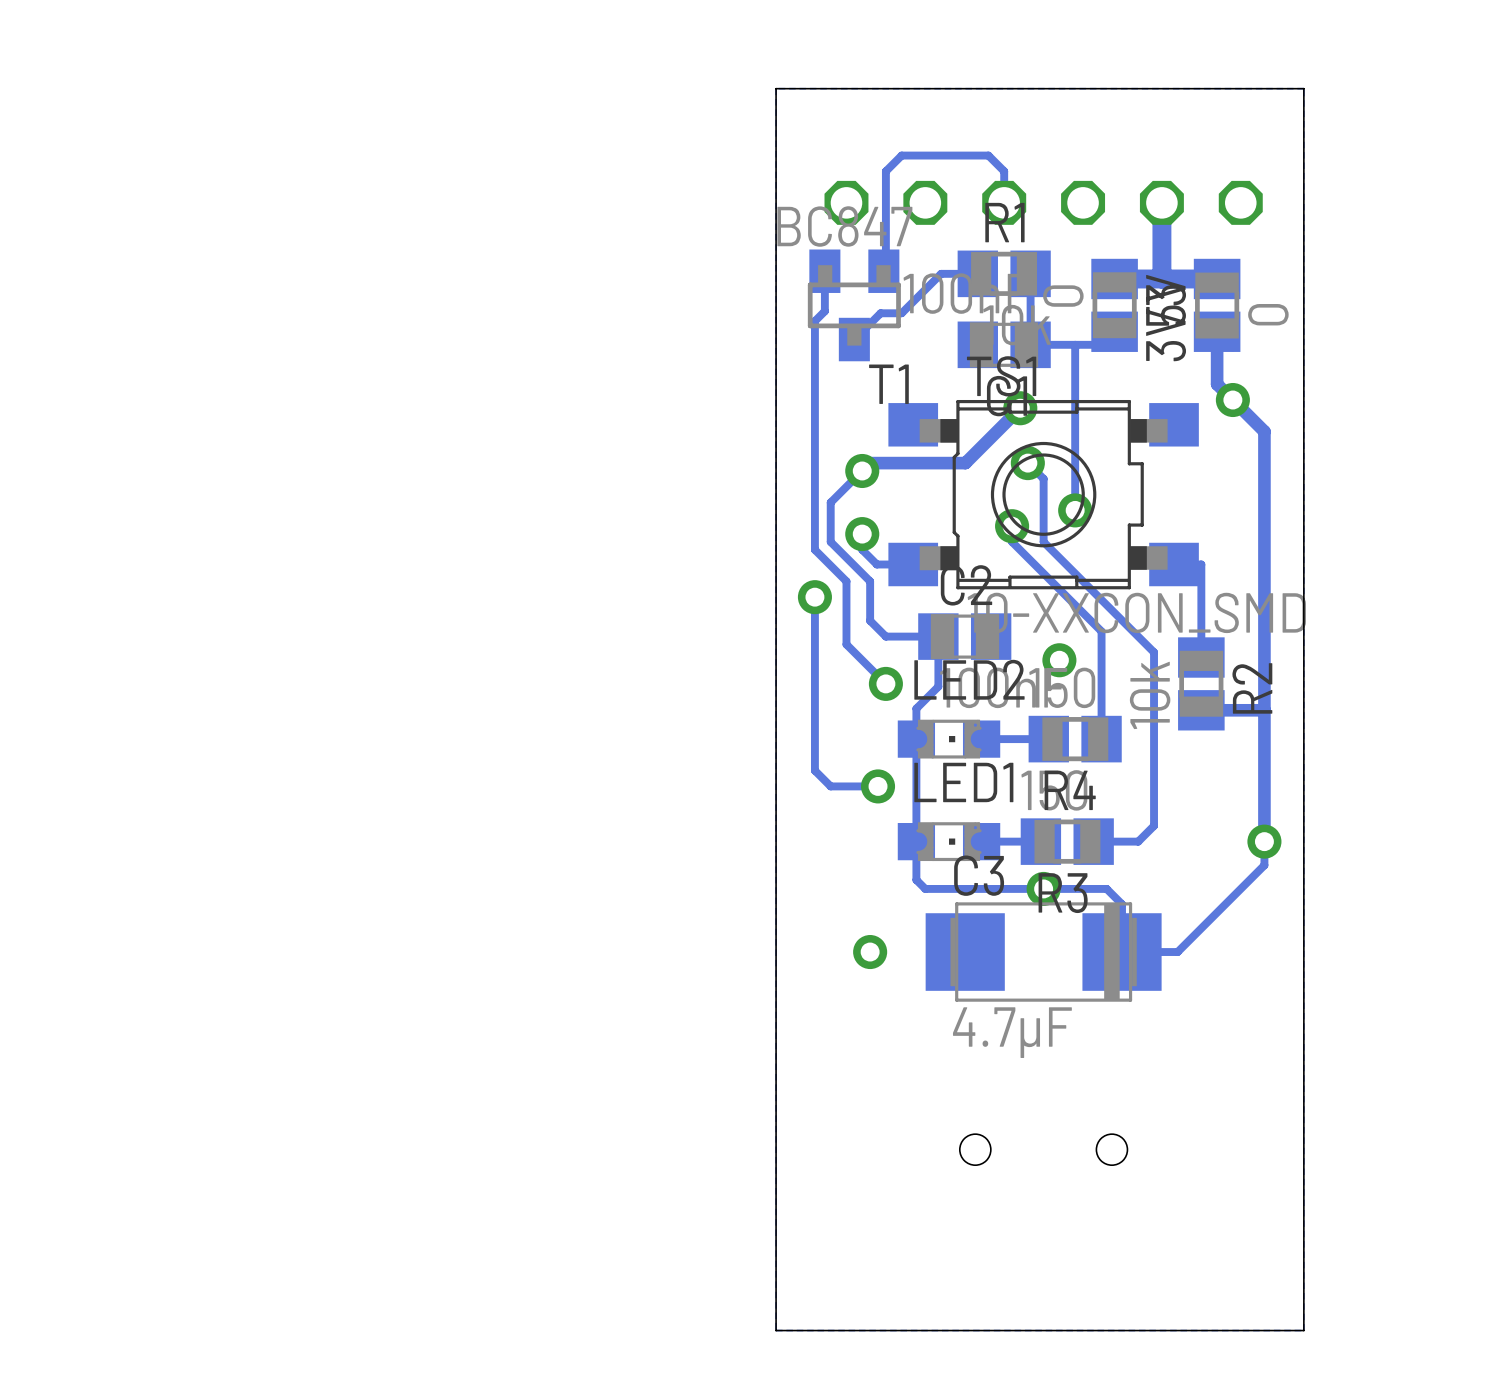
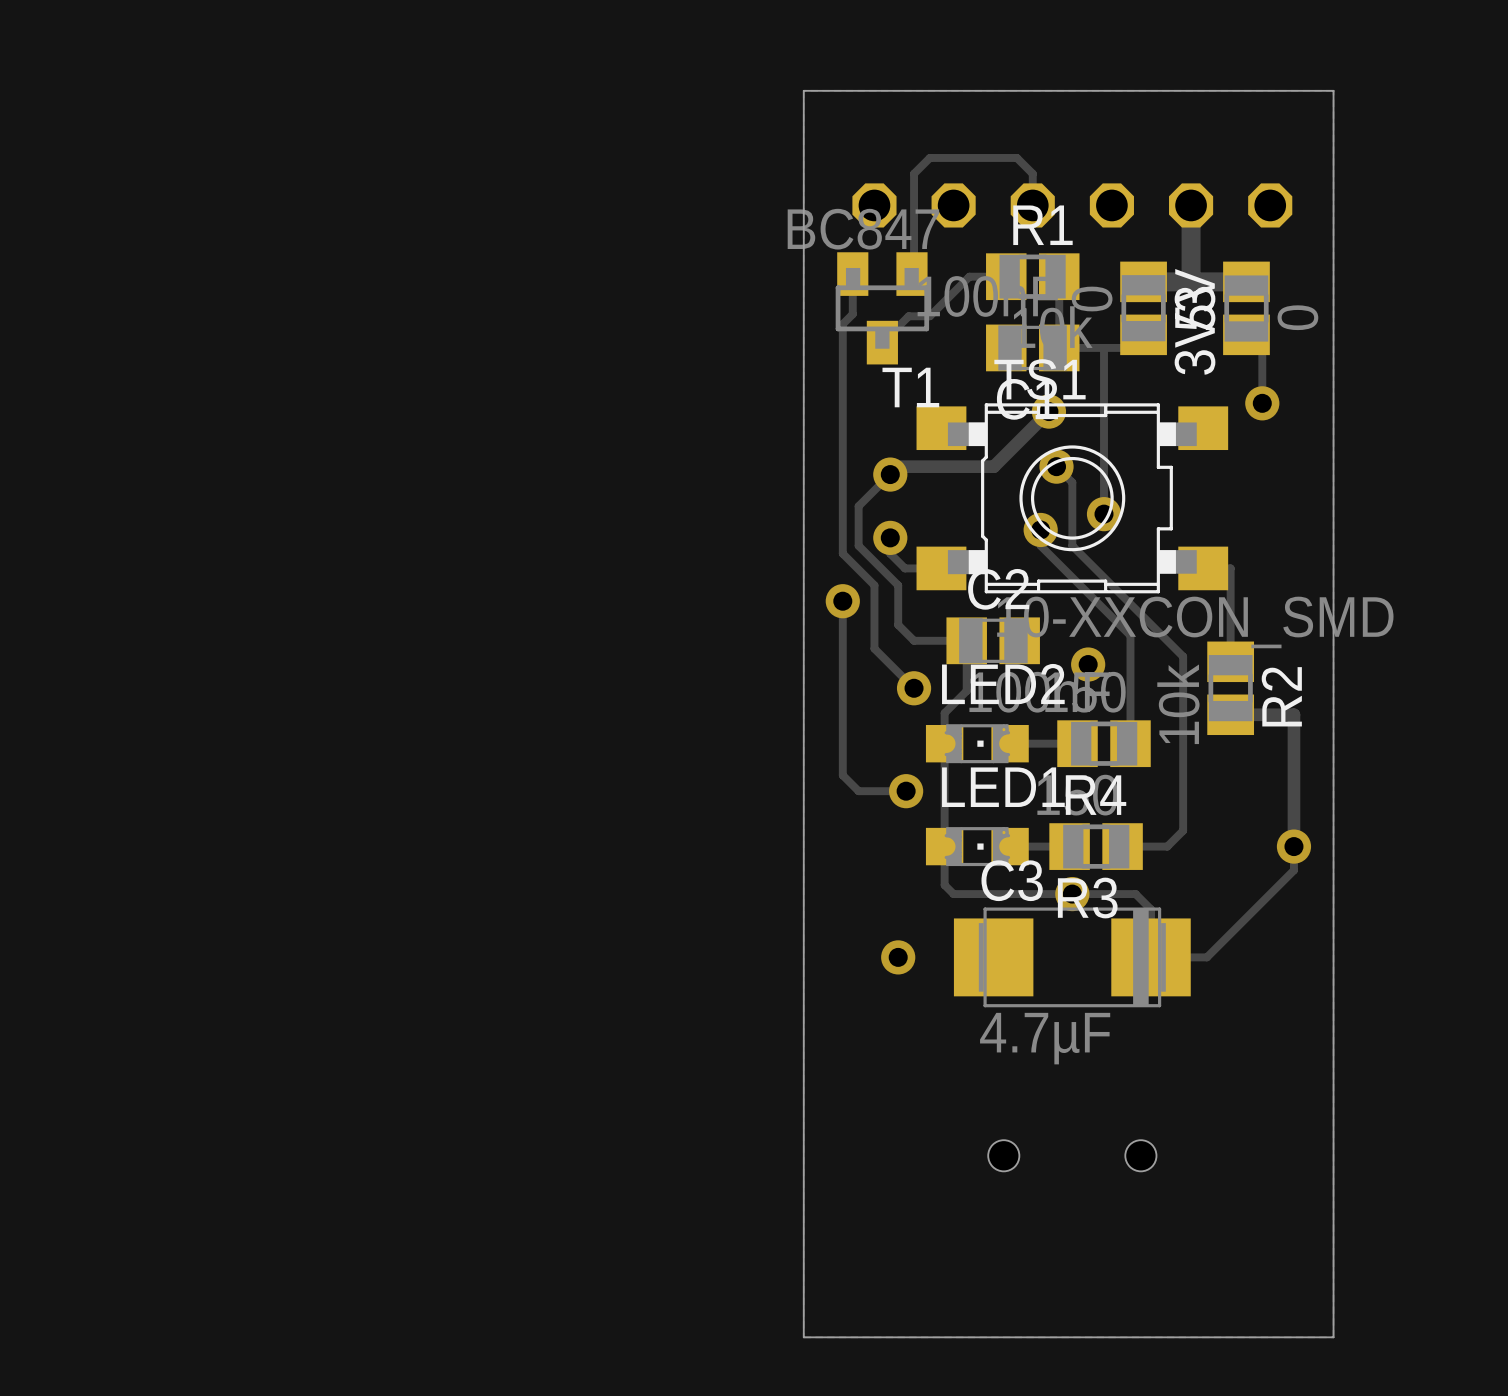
track: (1217, 331) (1217, 384) (1264, 431) (1264, 710) -> none
track: none -> (1262, 350) (1262, 403)

